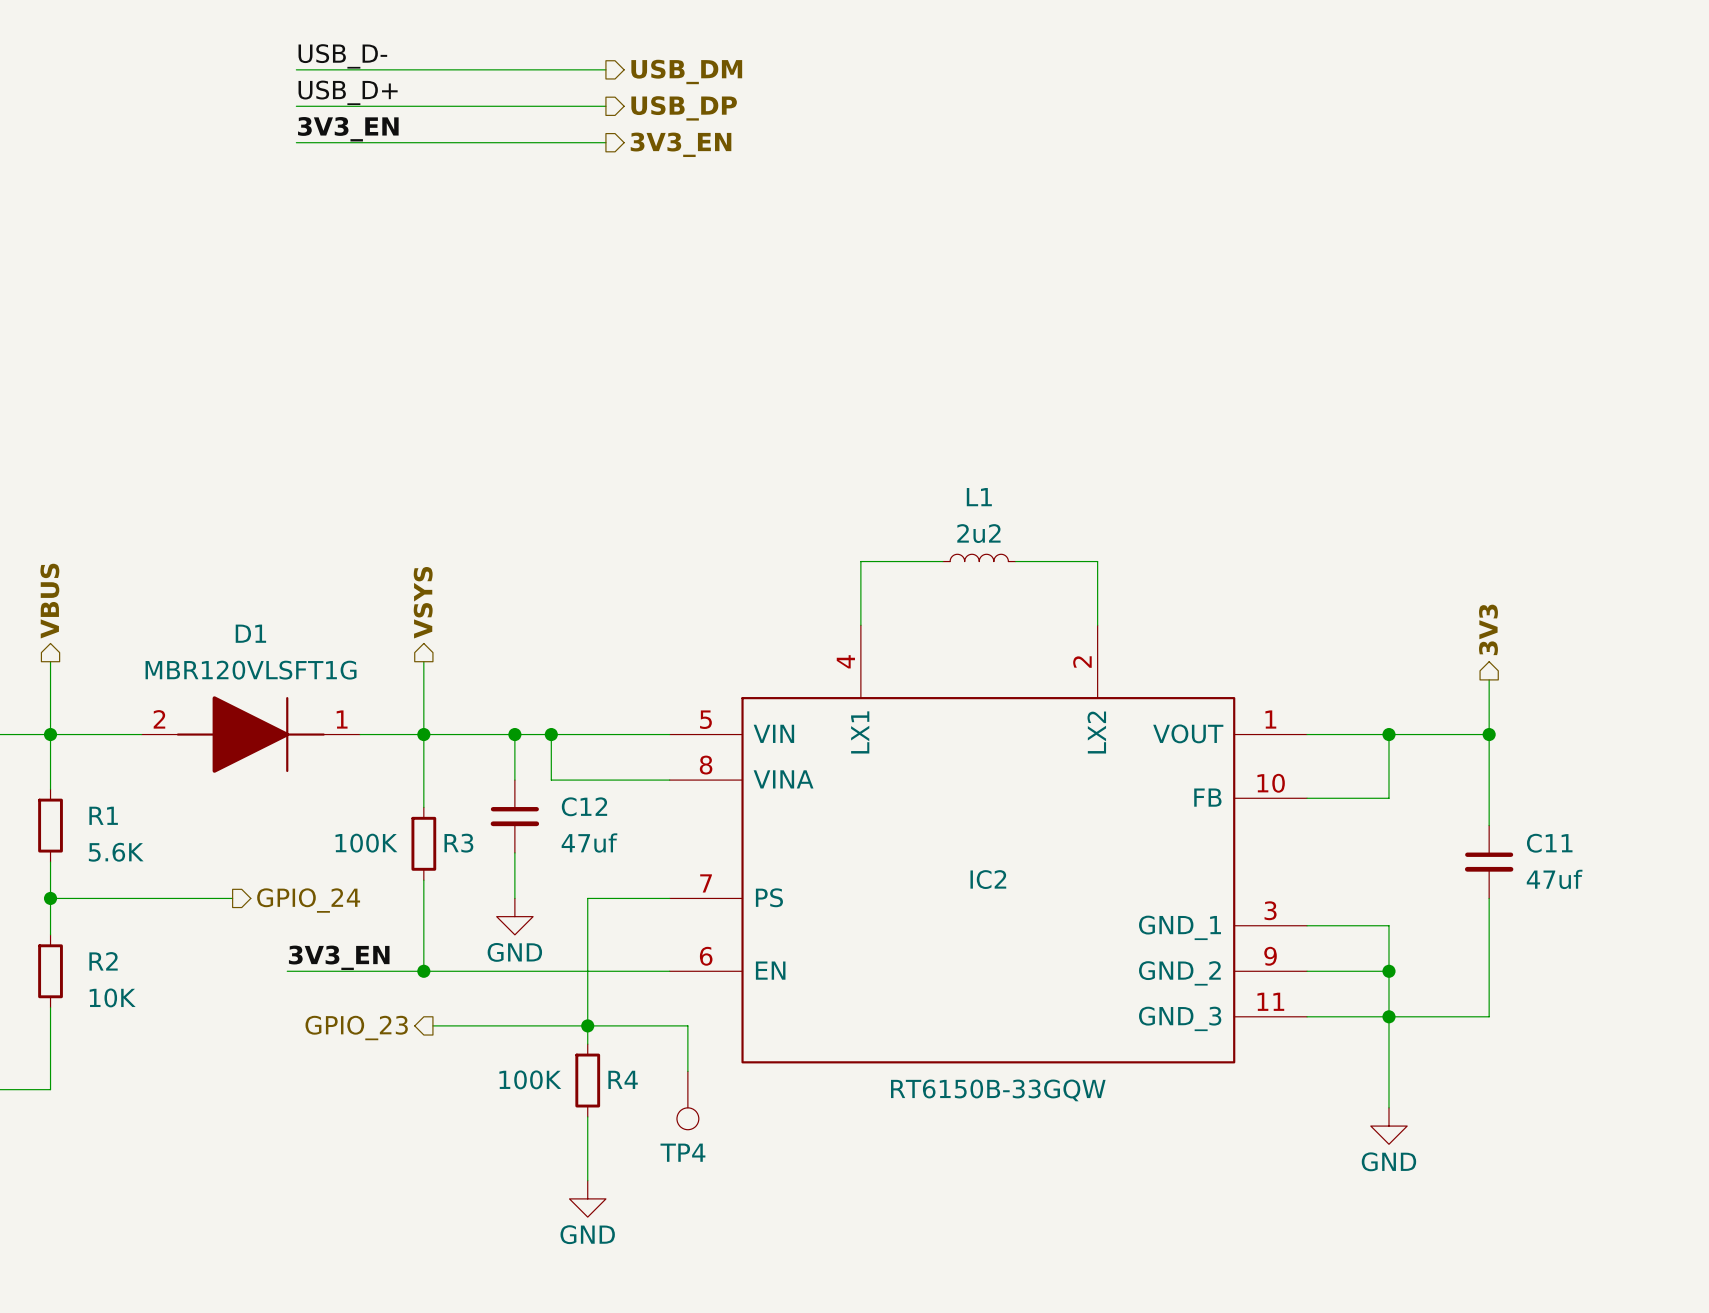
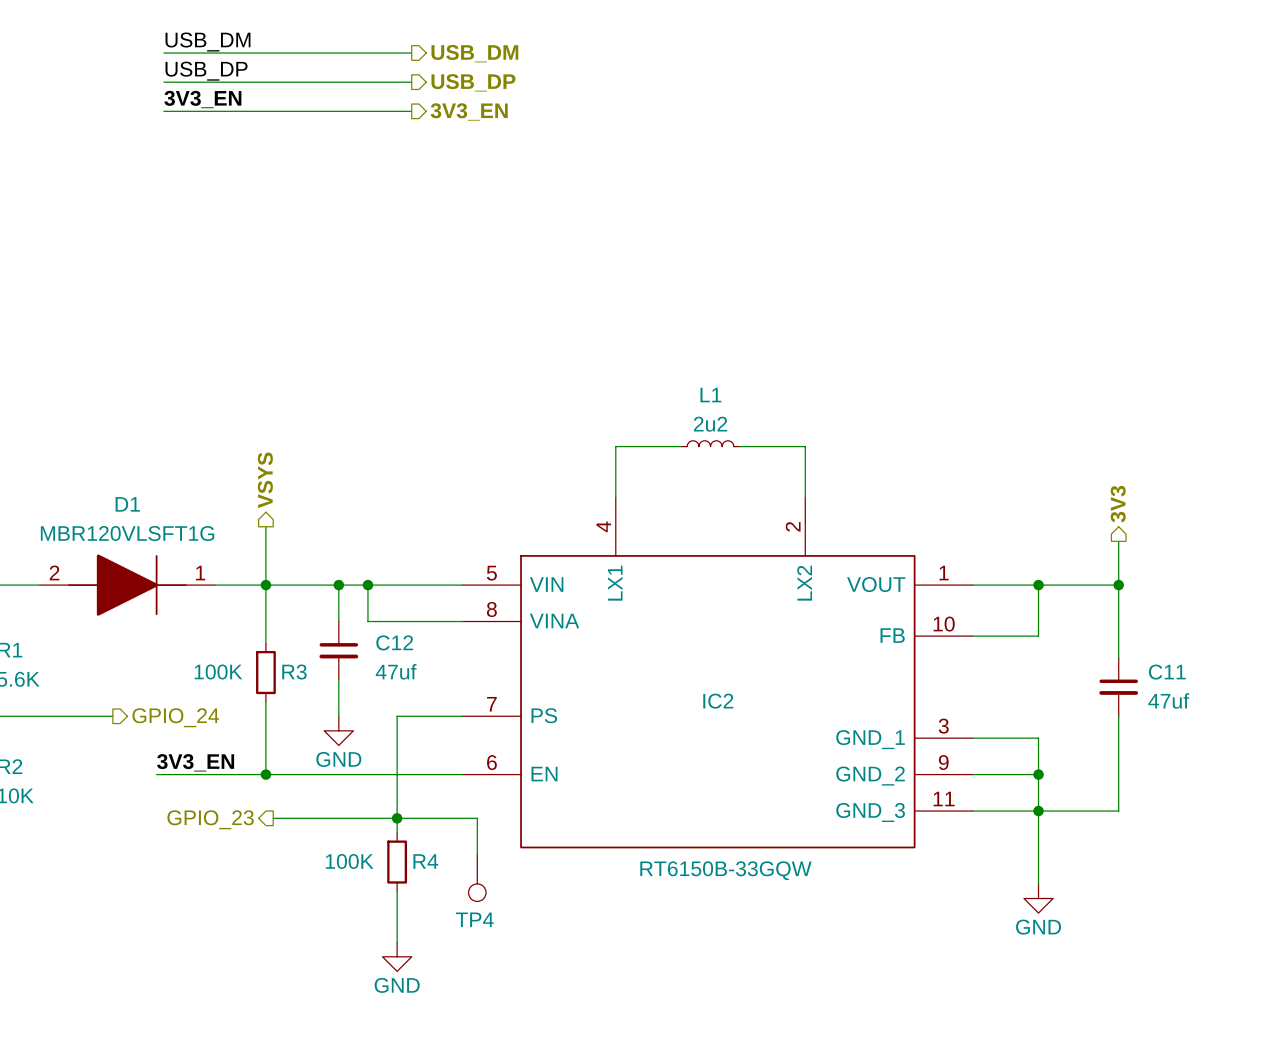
label: USB_D- (342, 56) -> USB_DM (207, 42)
label: USB_D+ (348, 92) -> USB_DP (206, 71)

